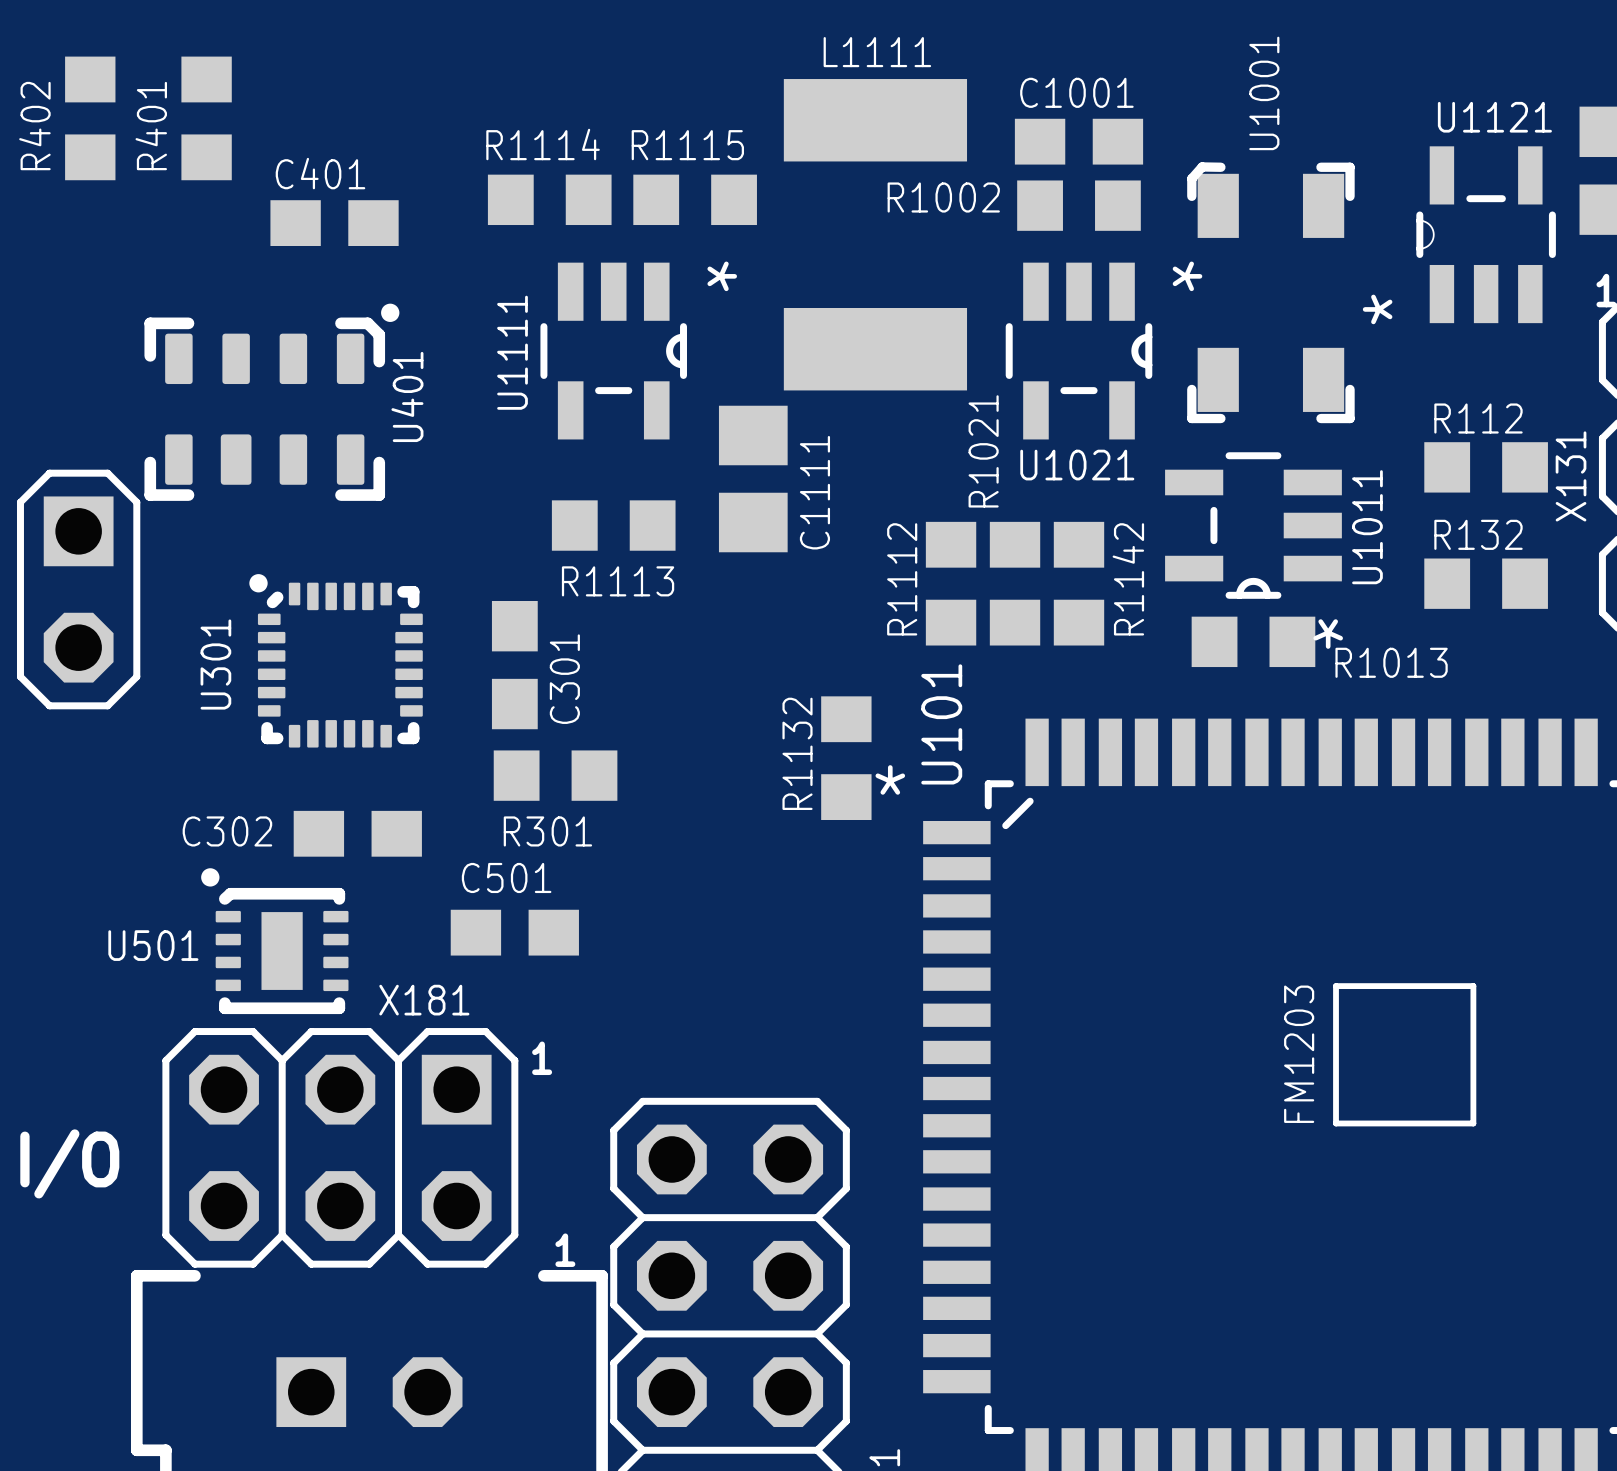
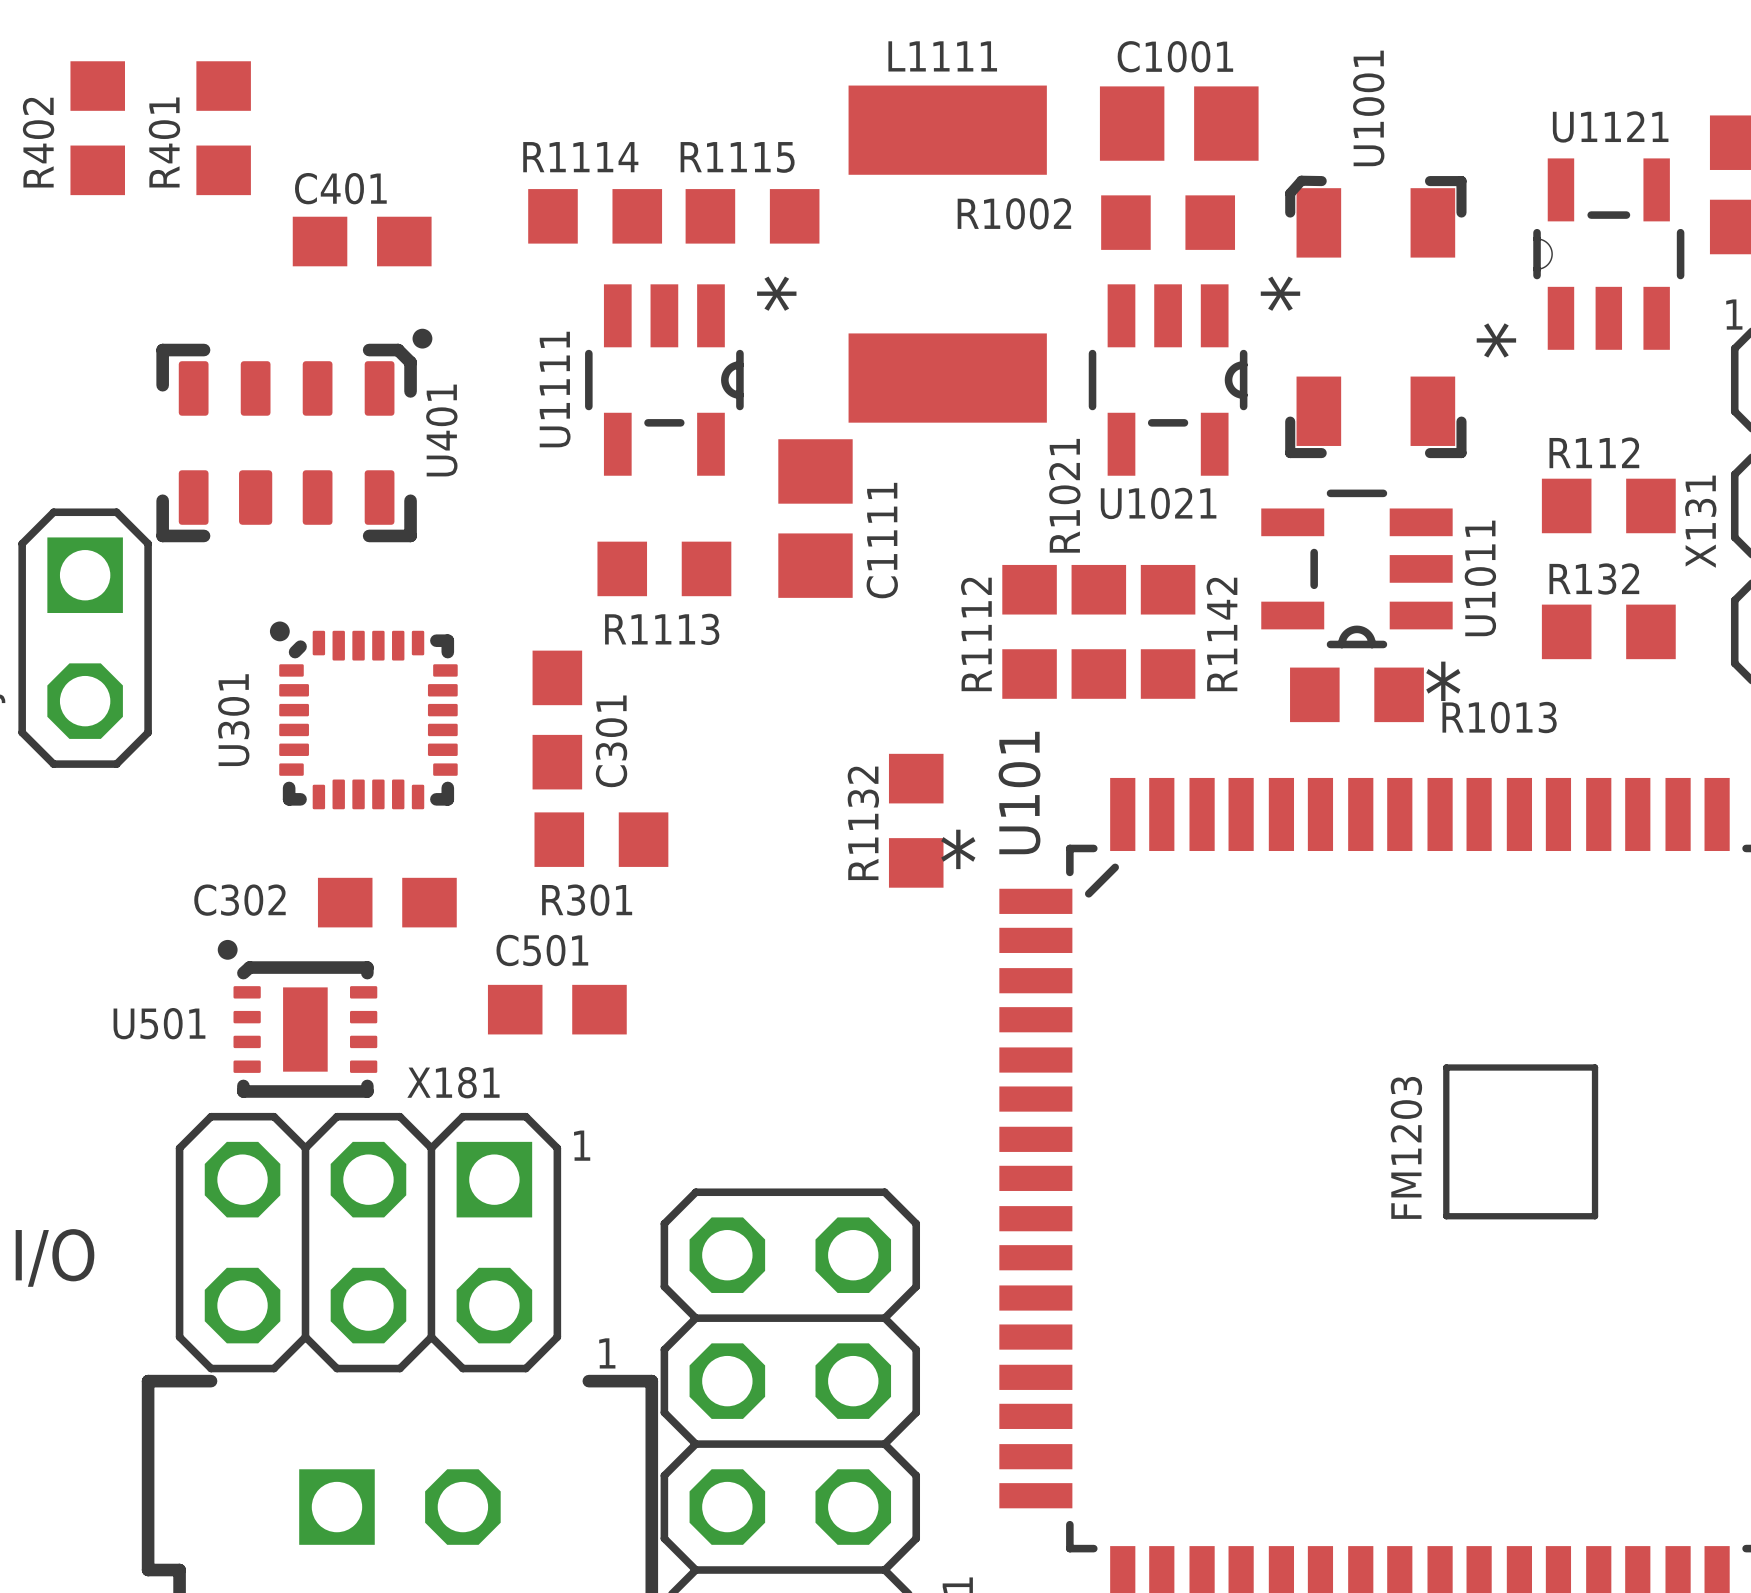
C1001 name position: C1001 (1076, 92) -> C1001 (1175, 56)
C1001 footprint: [1014, 118, 1144, 165] -> [1099, 86, 1259, 161]

